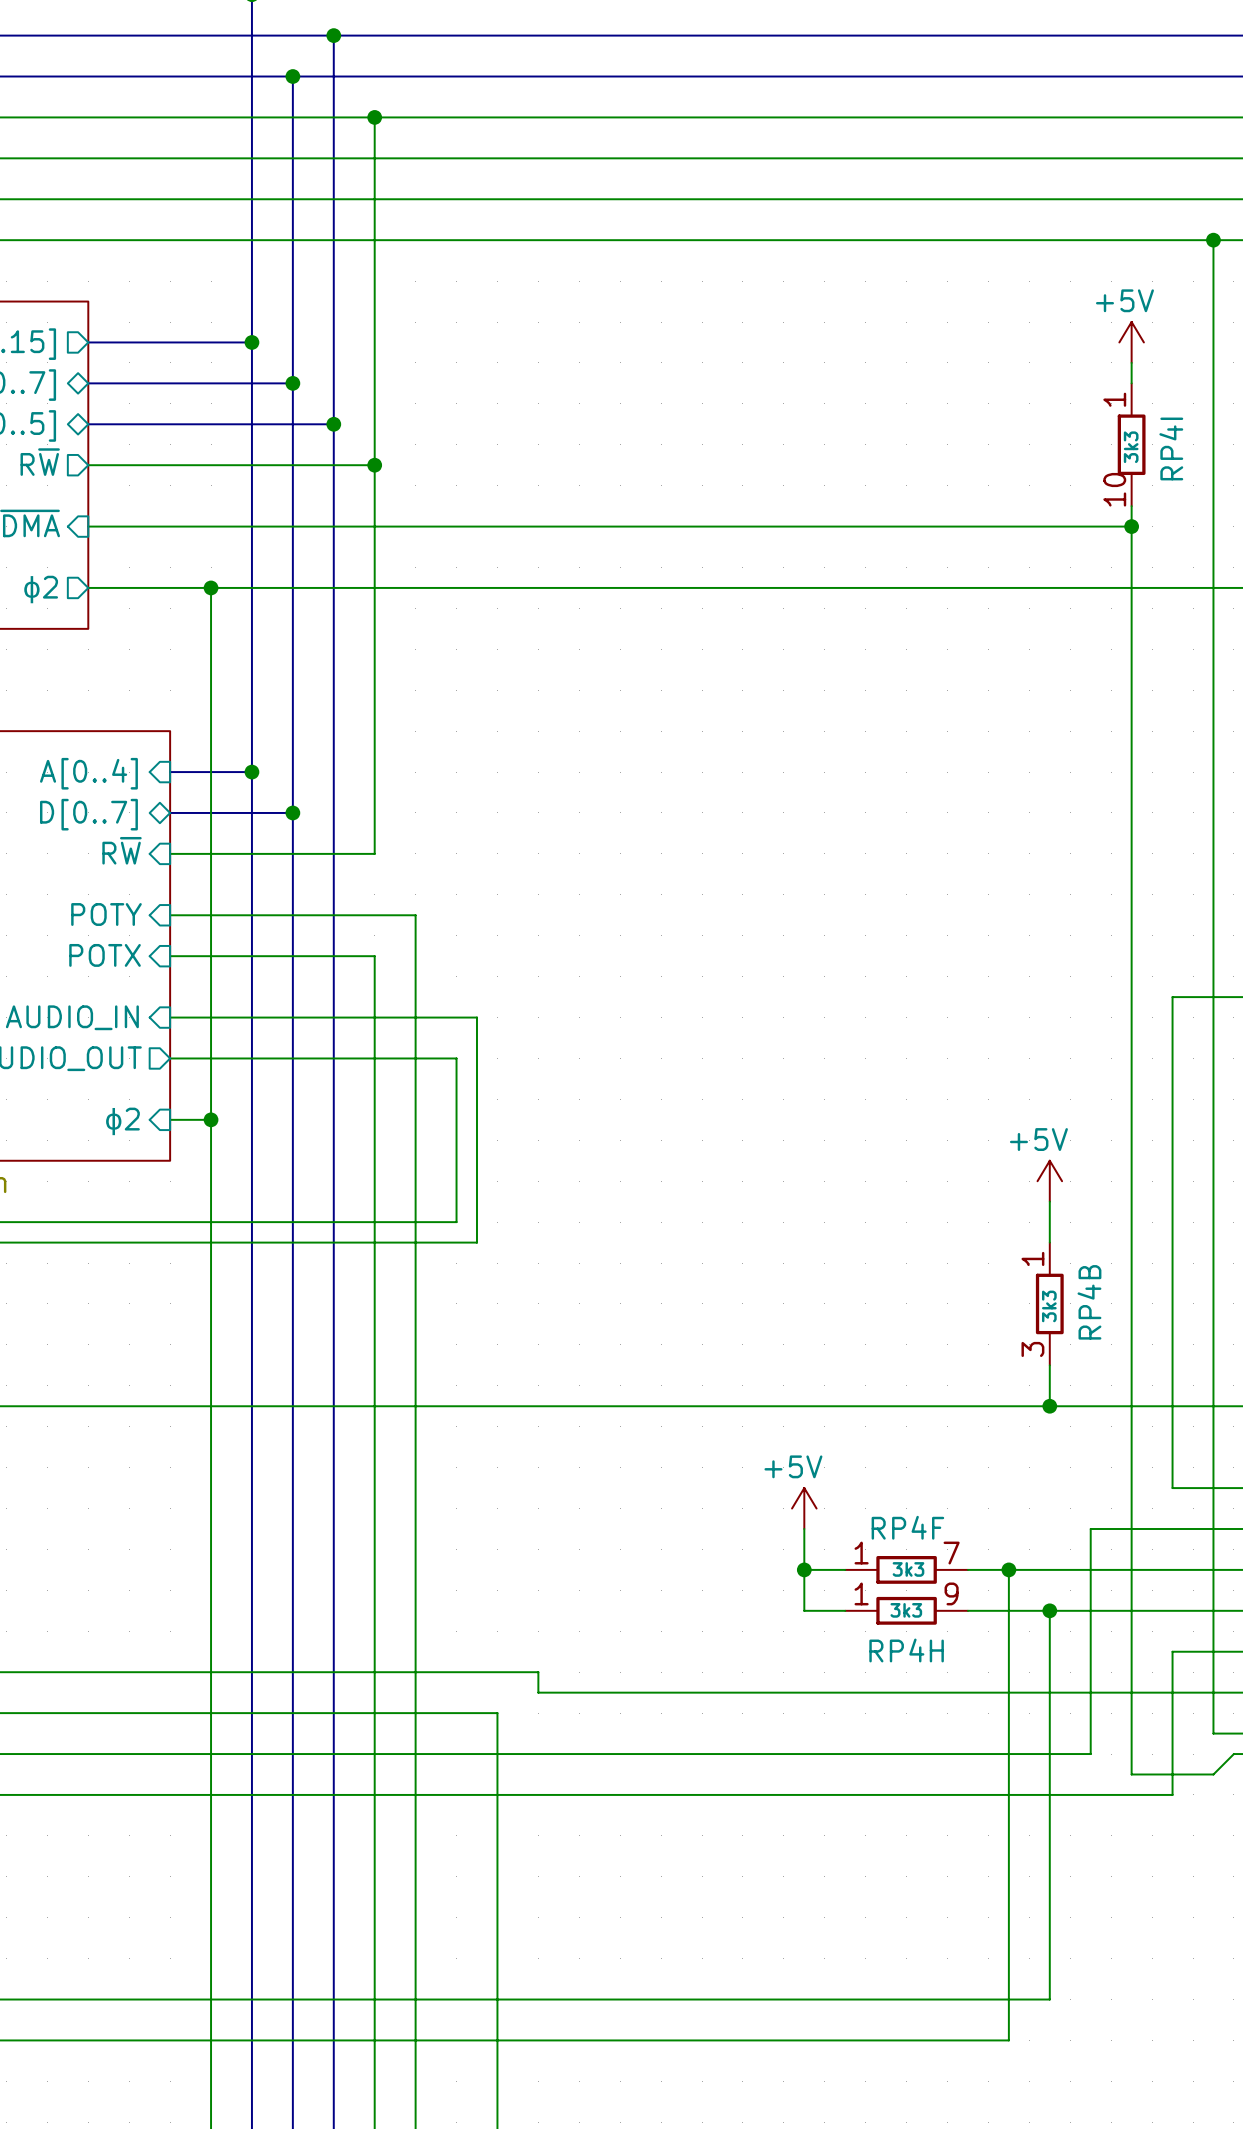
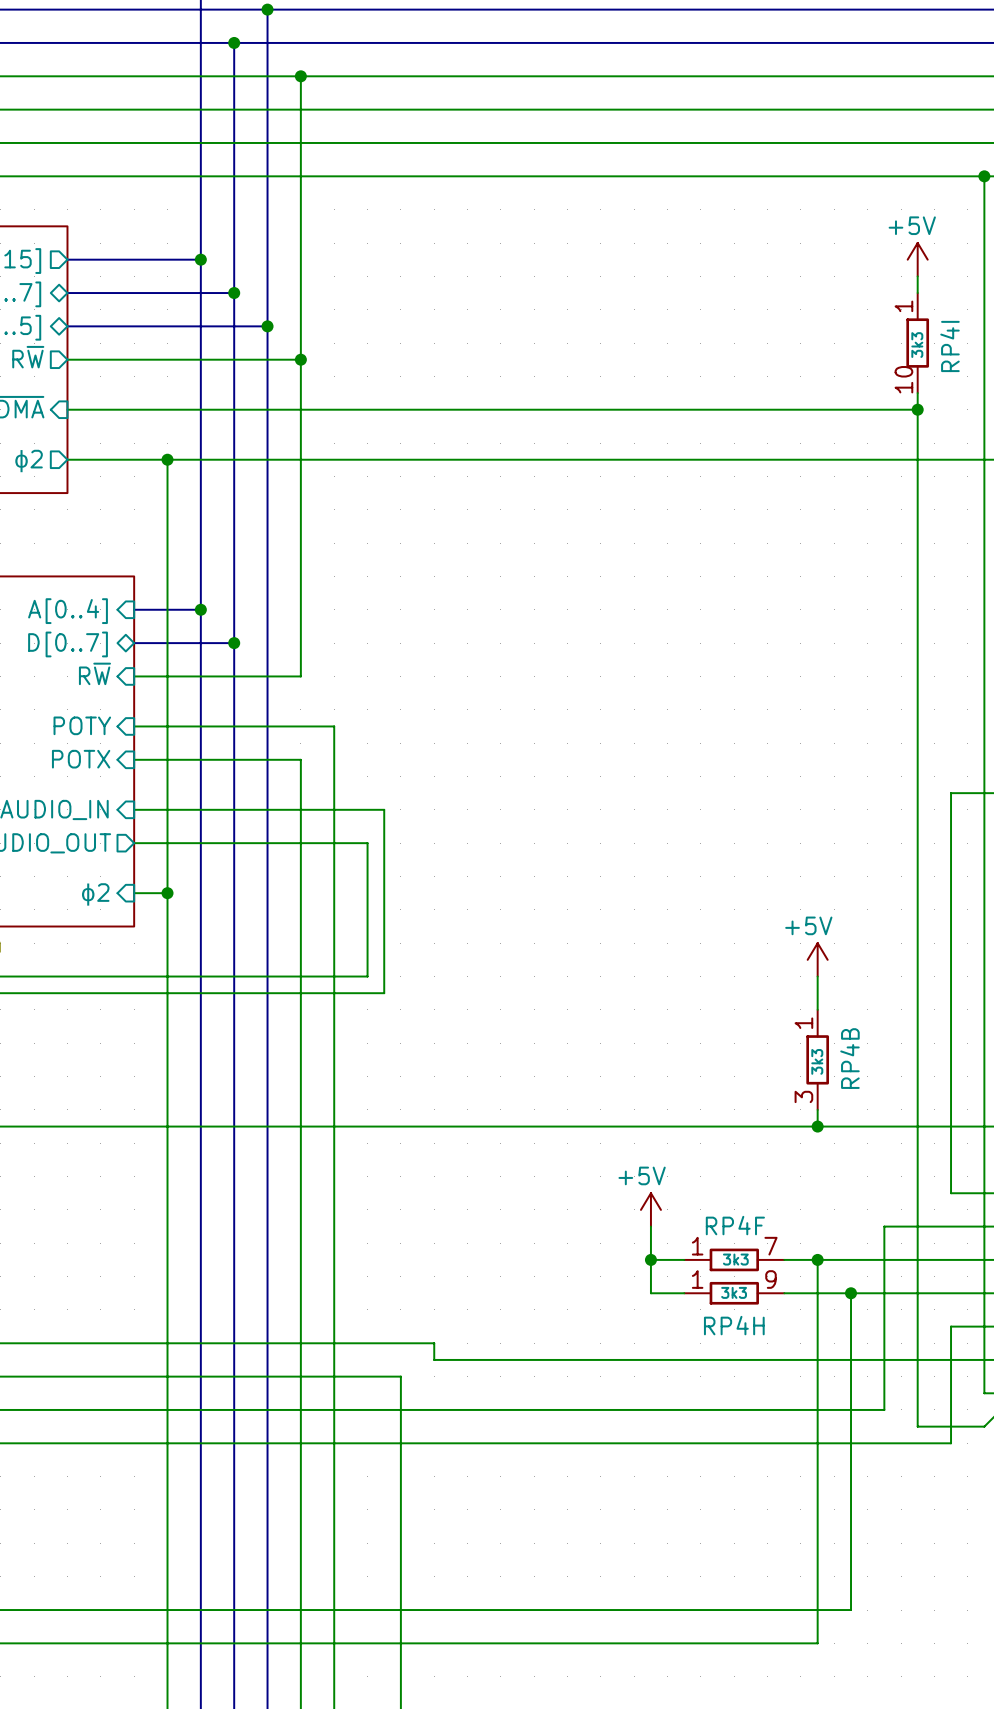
power symbol position: +5V (1049, 1181) -> +5V (817, 959)
wire: (1049, 1201) (1049, 1242) -> (817, 976) (817, 1009)
RP4B position: (1049, 1303) -> (817, 1059)
wire: (1049, 1365) (1049, 1406) -> none
wire: none -> (817, 1109) (817, 1126)
junction position: (1049, 1406) -> (817, 1126)

